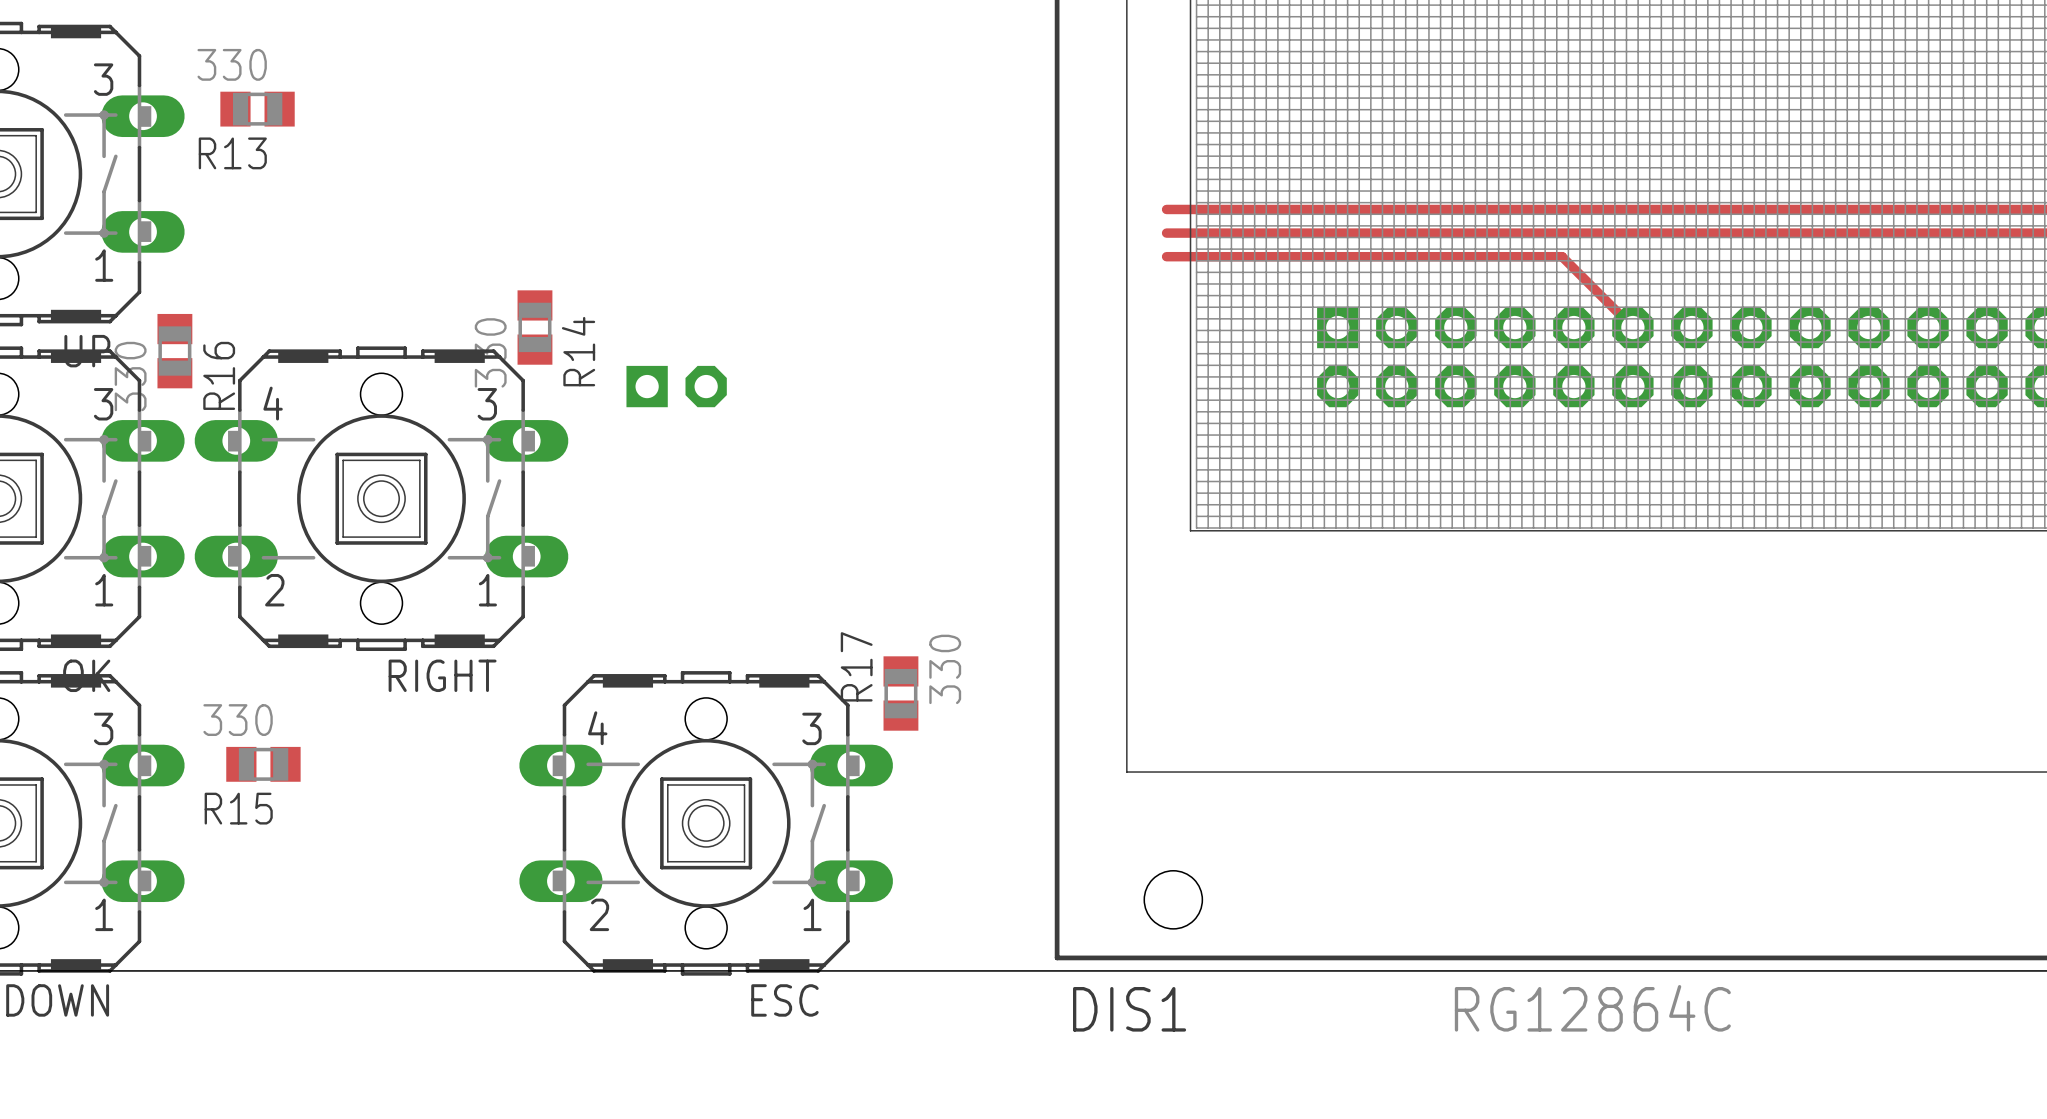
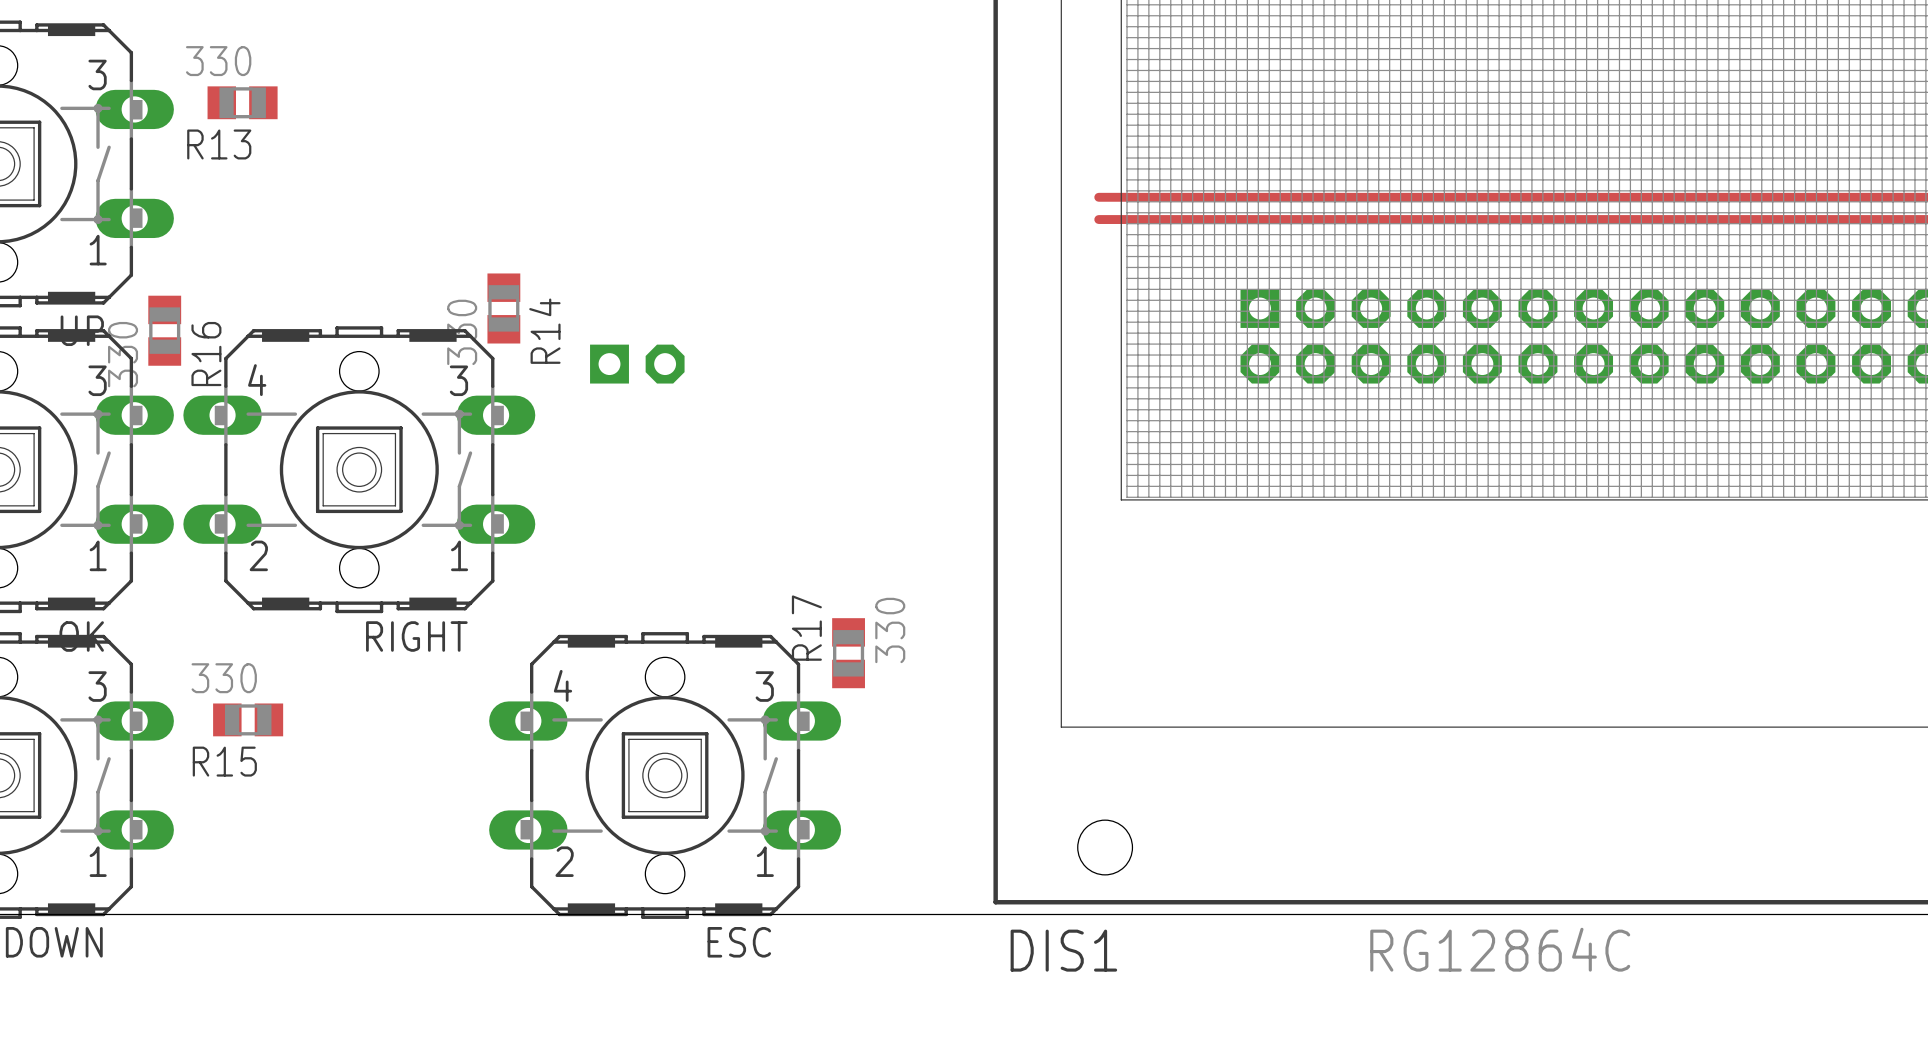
track: (1166, 256) (1562, 256) (1632, 327) -> none

